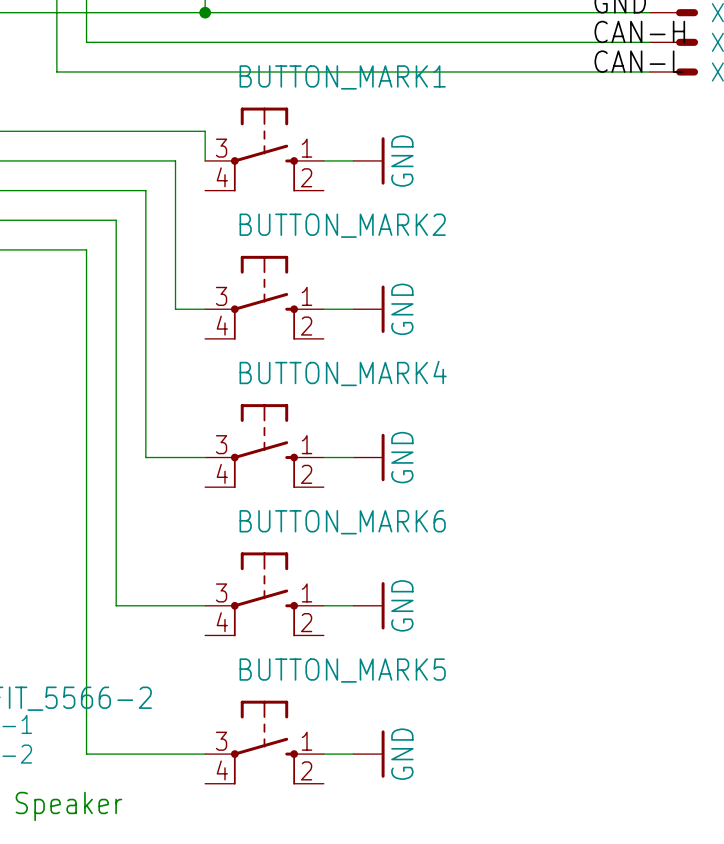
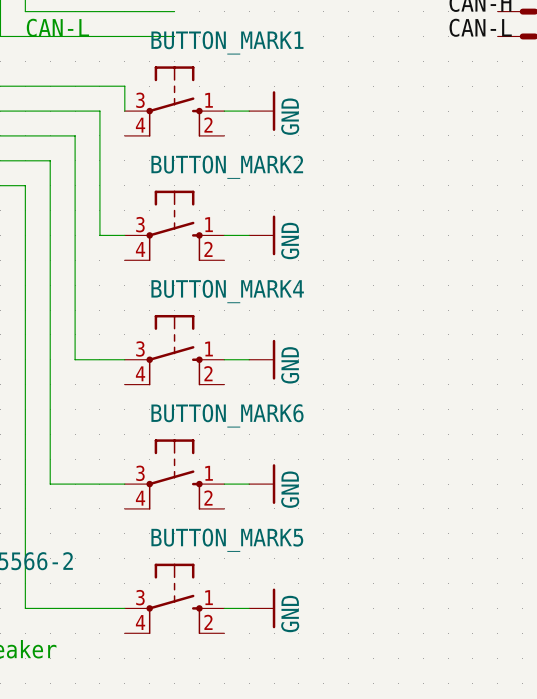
wire: (264, 42) (649, 42) -> none
text: none -> CAN-L (57, 27)
wire: (264, 71) (649, 71) -> none

